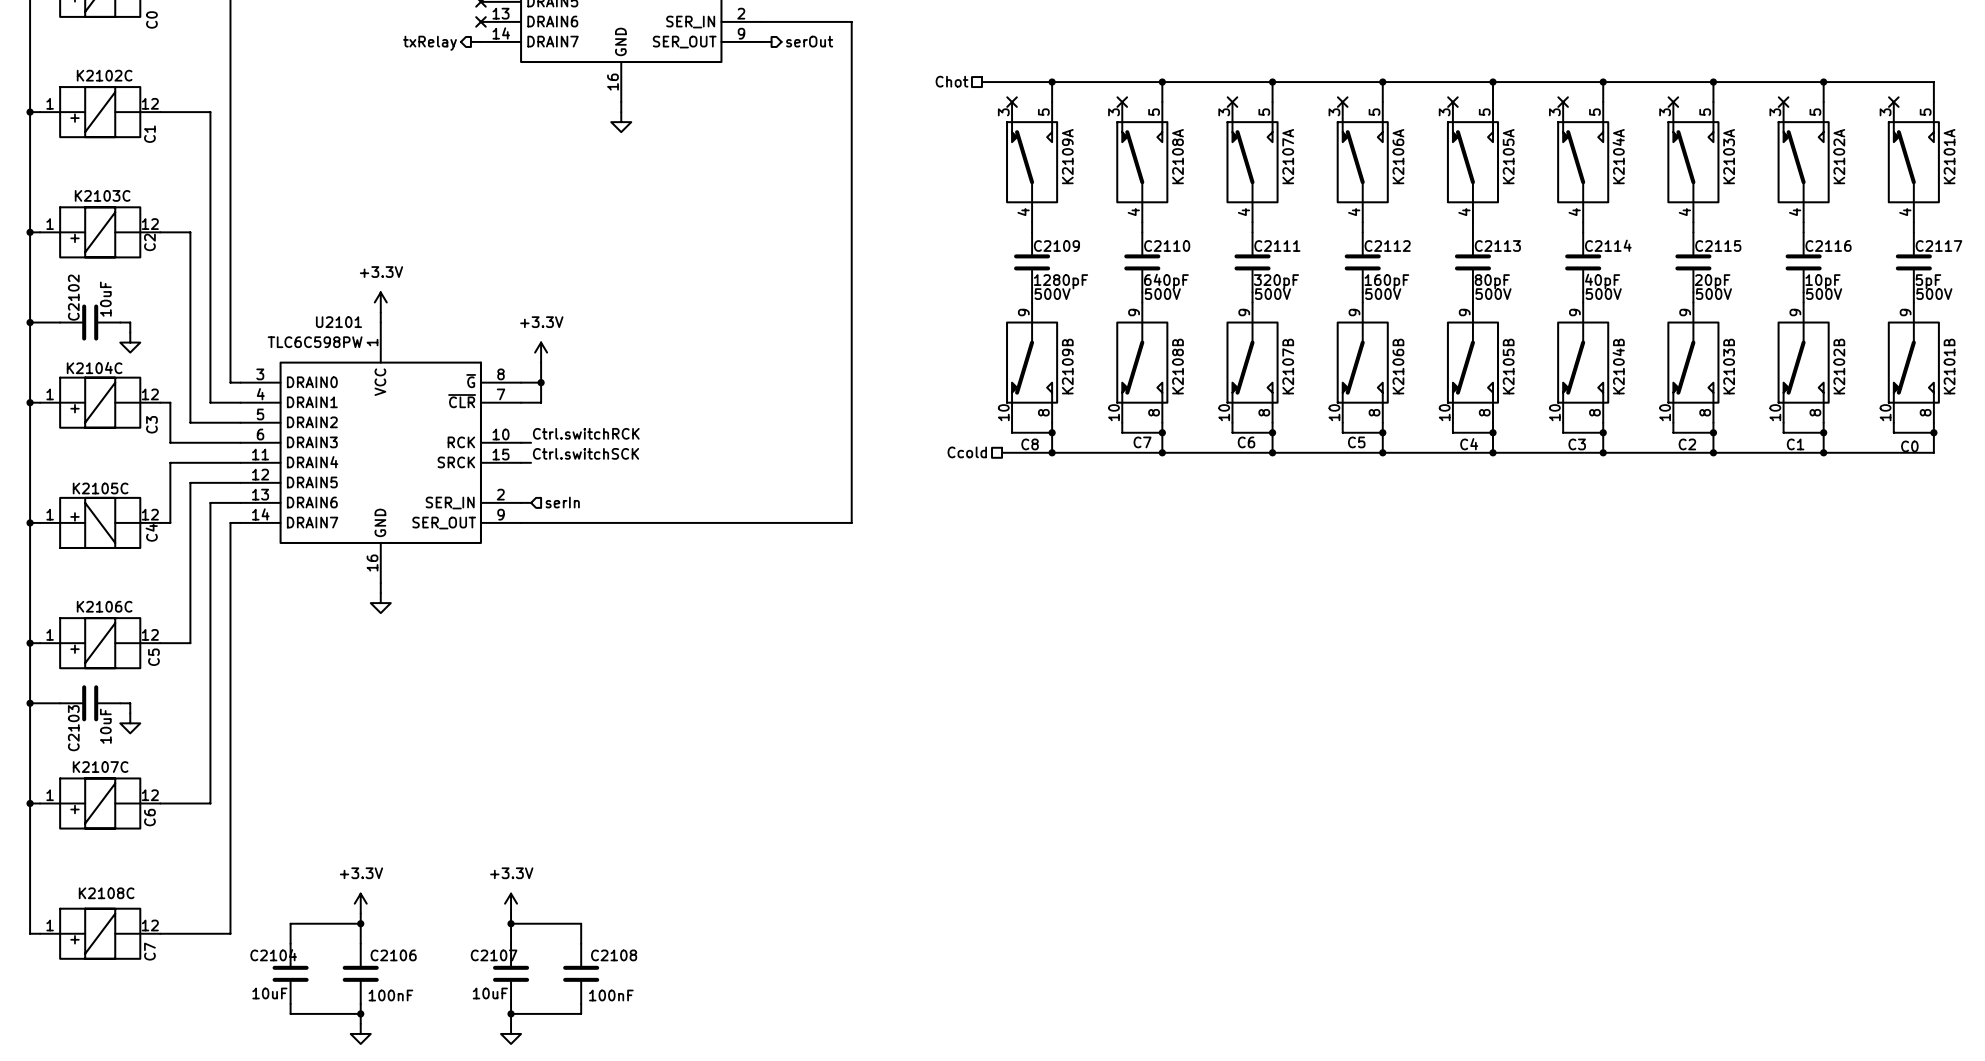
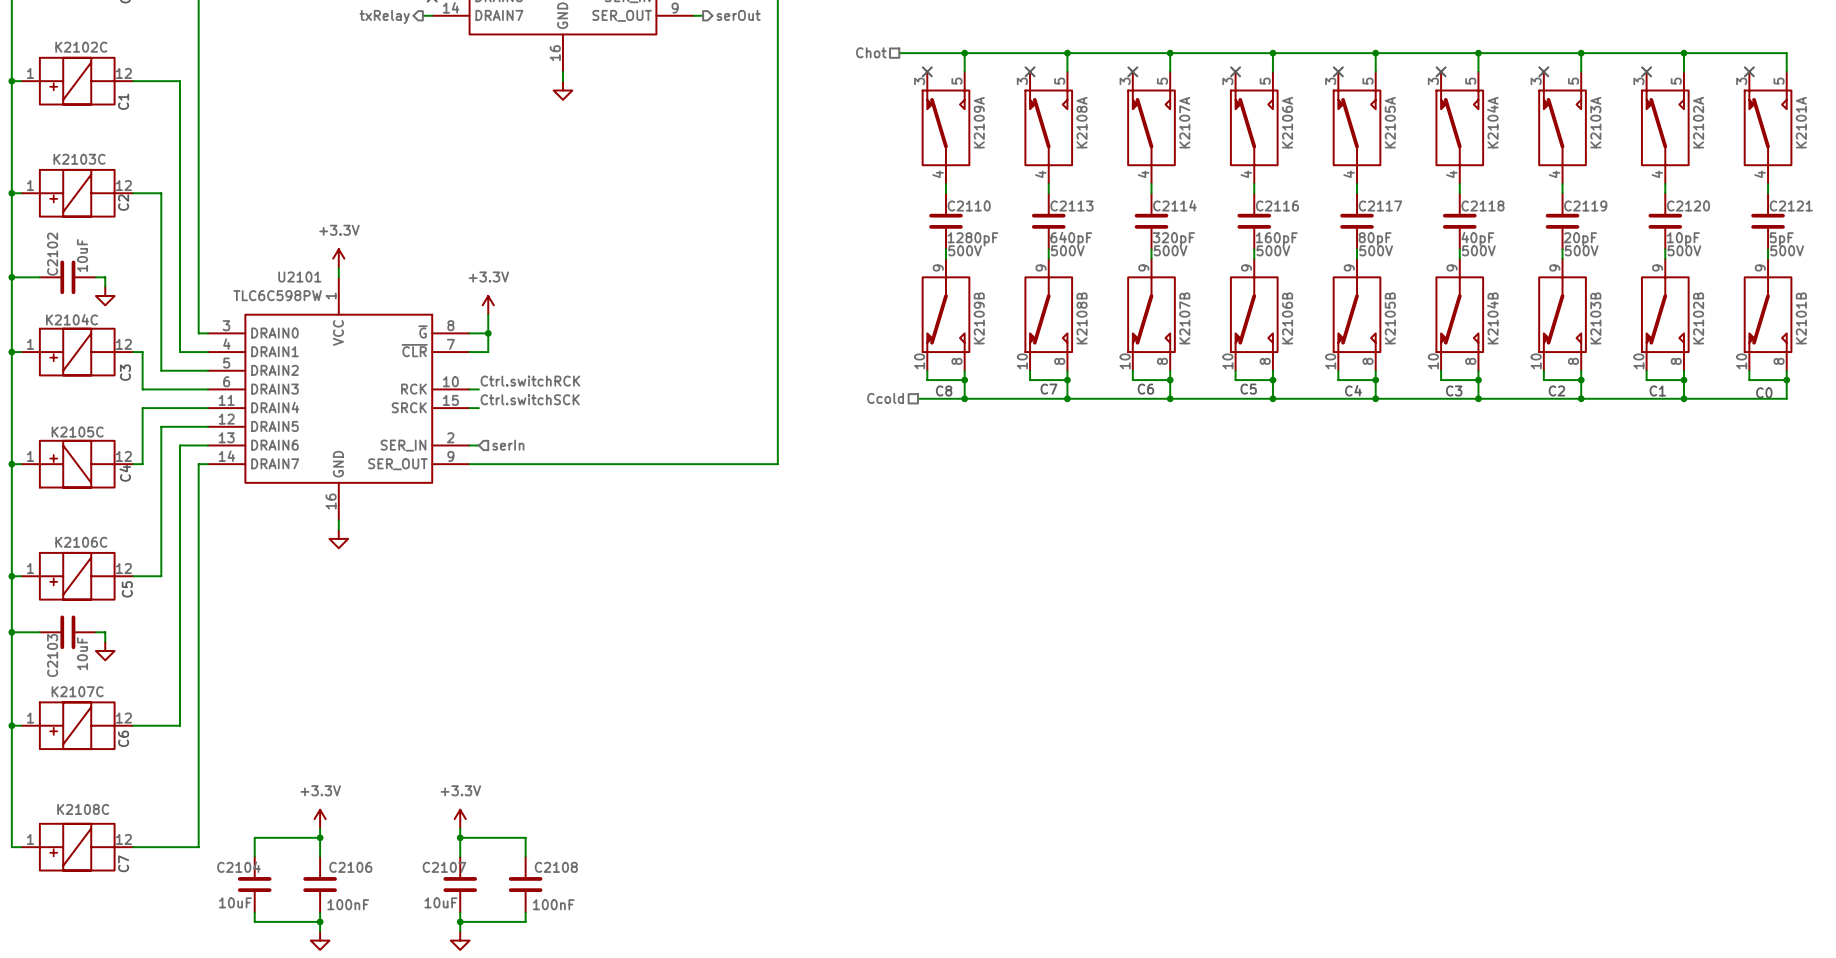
C2114 name: C2114 (1608, 245) -> C2118 (1482, 205)
C2109 name: C2109 (1056, 246) -> C2110 (969, 205)
C2110 name: C2110 (1167, 246) -> C2113 (1071, 205)
C2111 name: C2111 (1277, 246) -> C2114 (1174, 205)
C2112 name: C2112 (1387, 246) -> C2116 (1277, 205)
C2113 name: C2113 (1497, 246) -> C2117 (1380, 205)
C2115 name: C2115 (1718, 246) -> C2119 (1585, 205)
C2116 name: C2116 (1828, 246) -> C2120 (1688, 205)
C2117 name: C2117 (1938, 246) -> C2121 (1791, 205)

